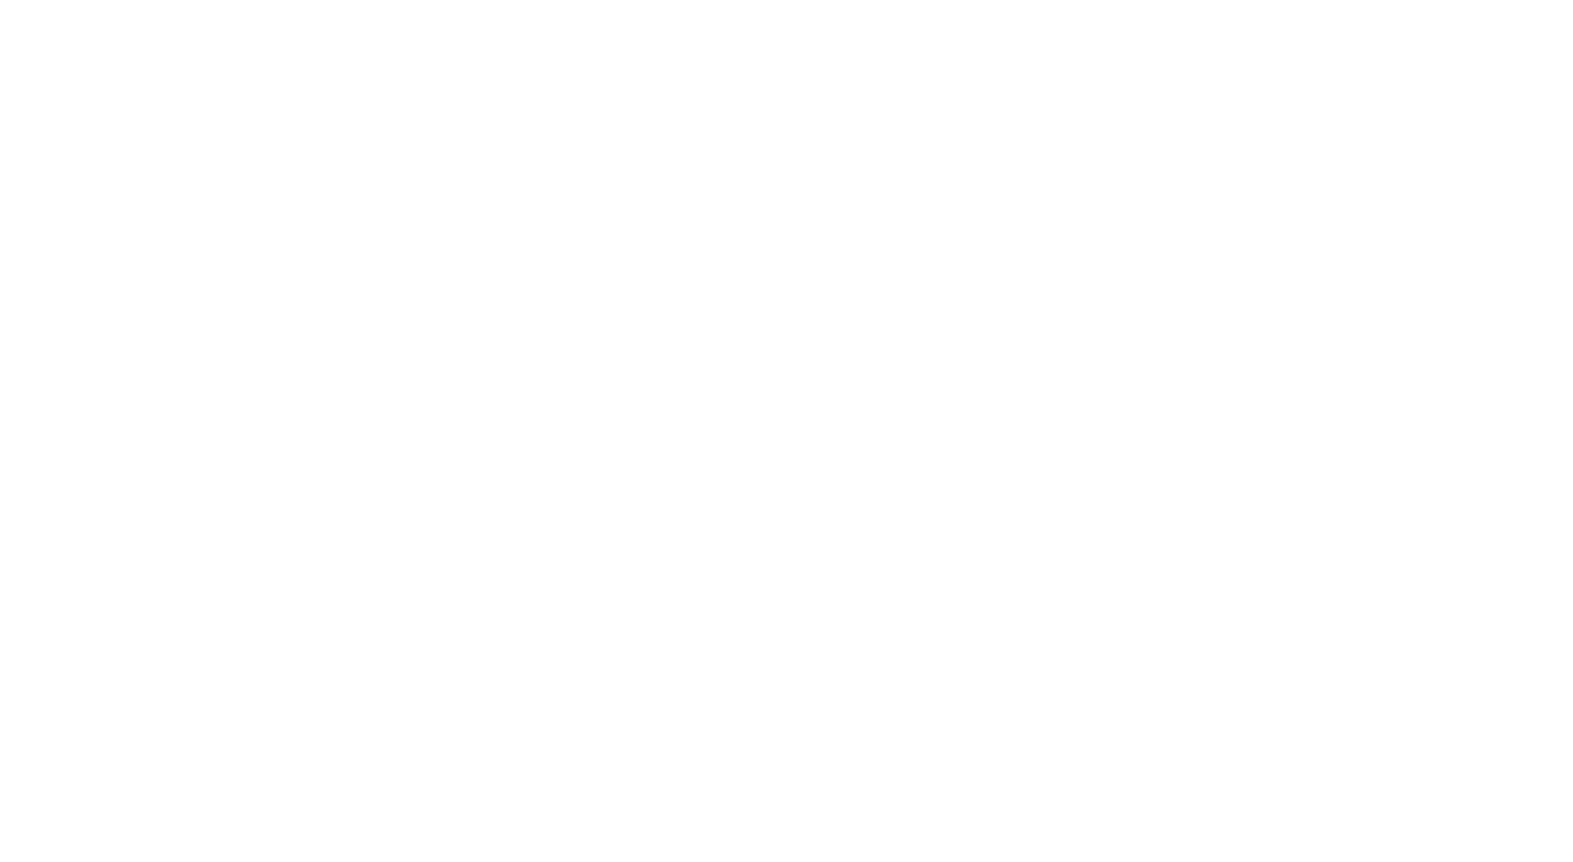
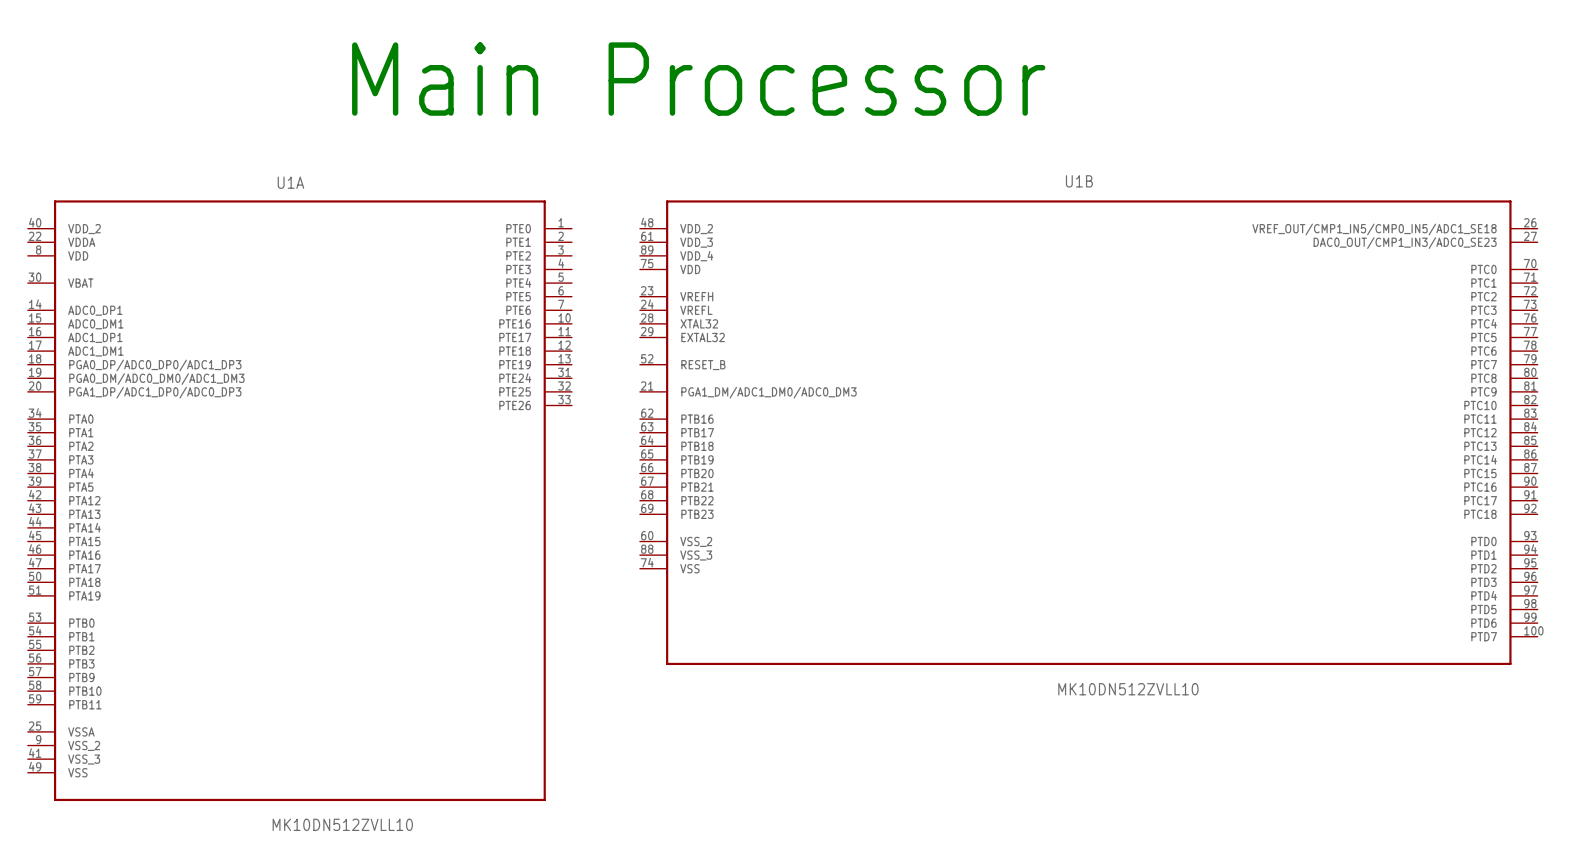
text: none -> Main Processor (698, 79)
U1B: none -> MK10DN512ZVLL10 (1088, 432)
U1A: none -> MK10DN512ZVLL10 (299, 500)

